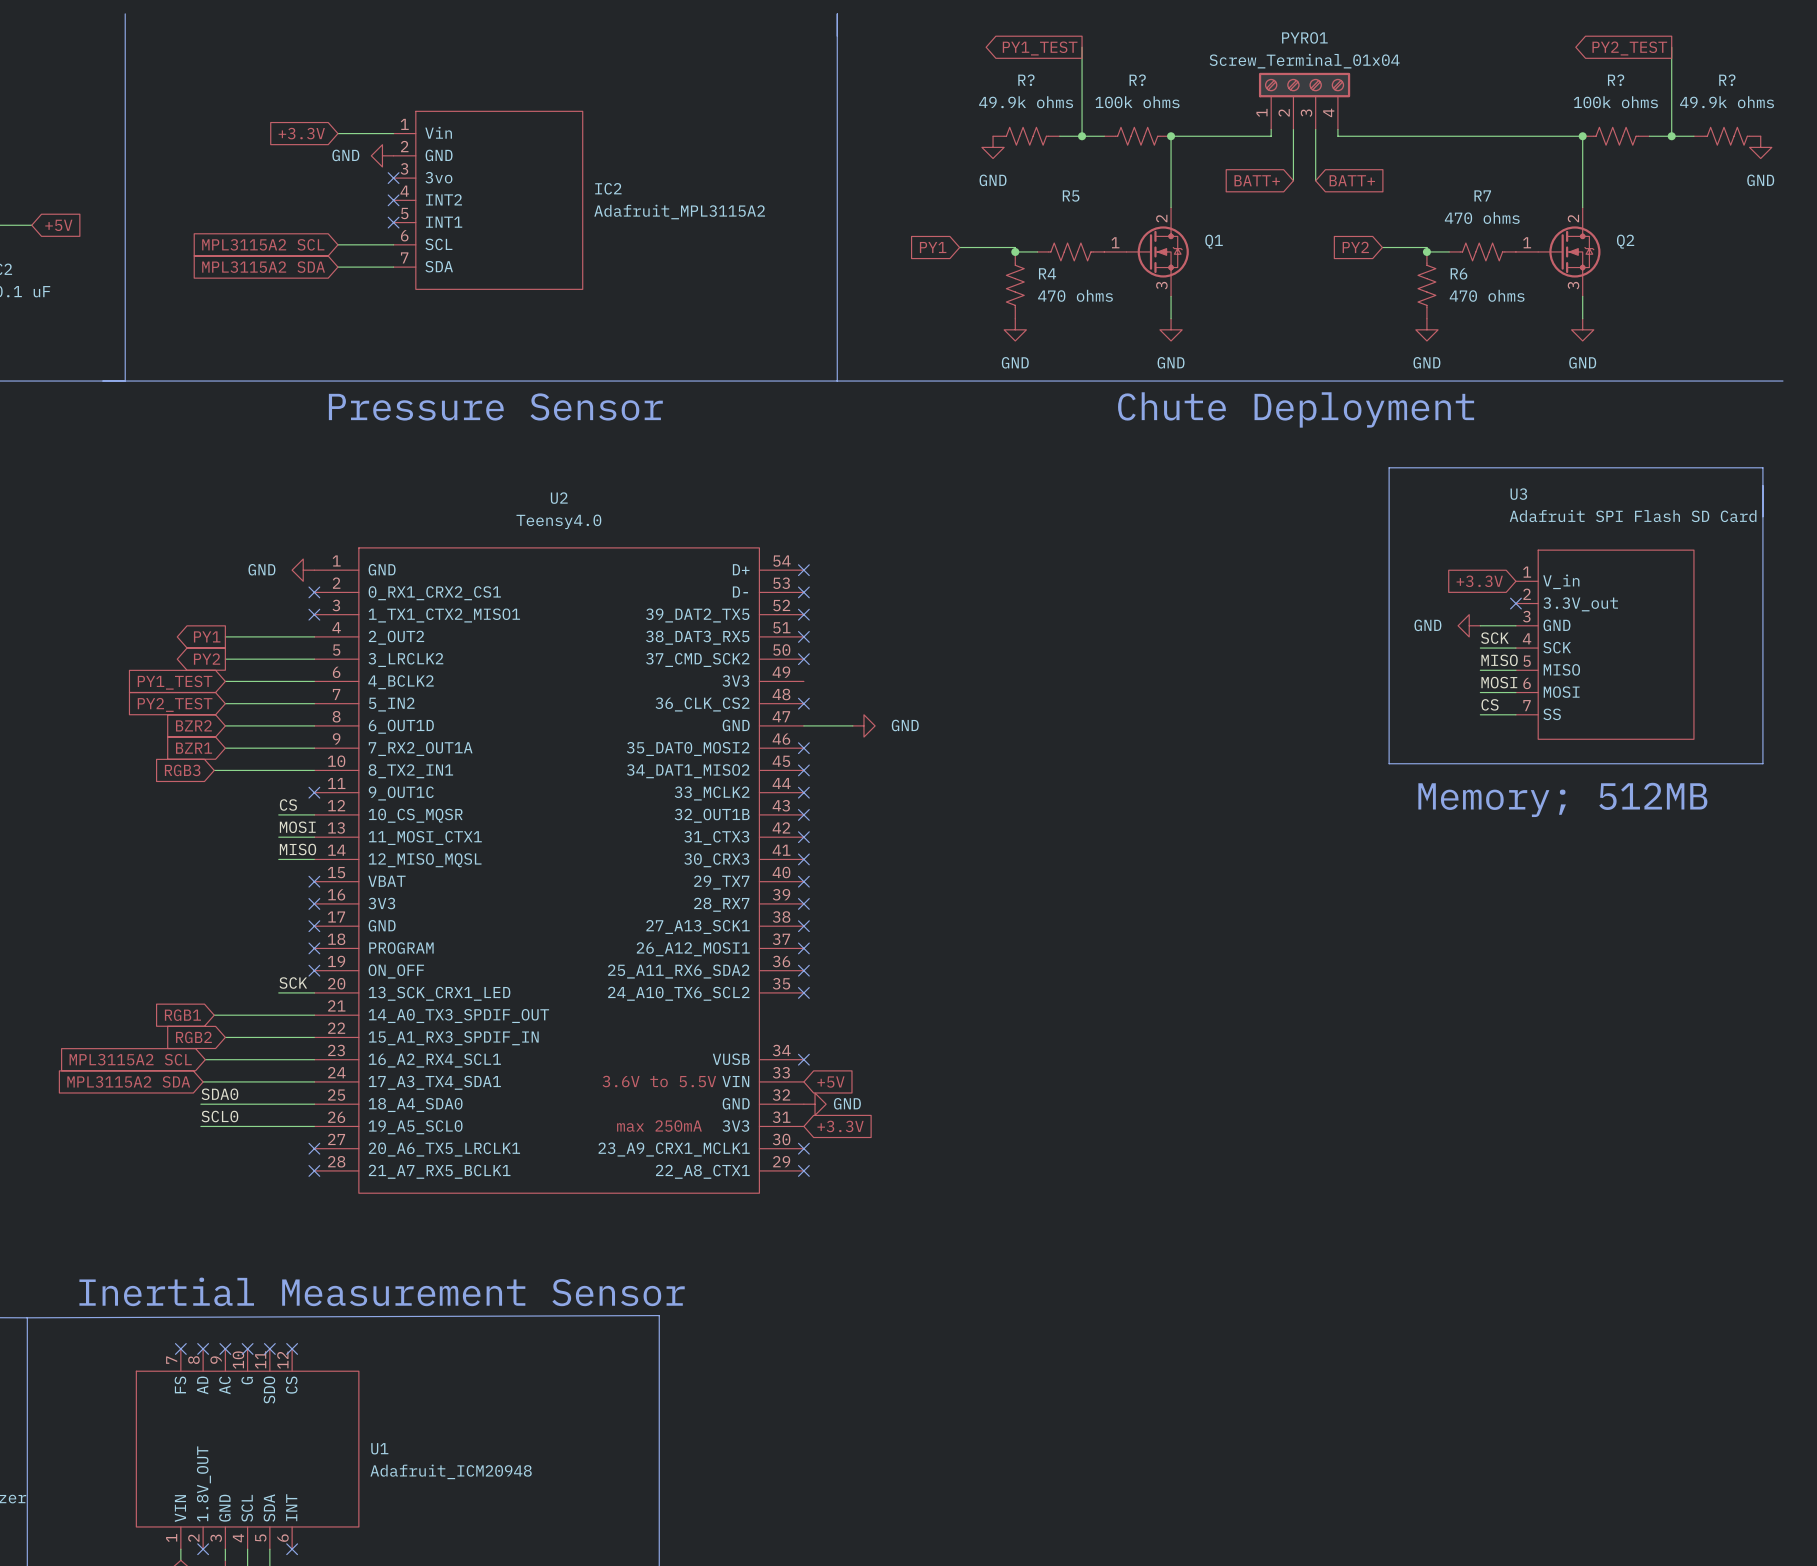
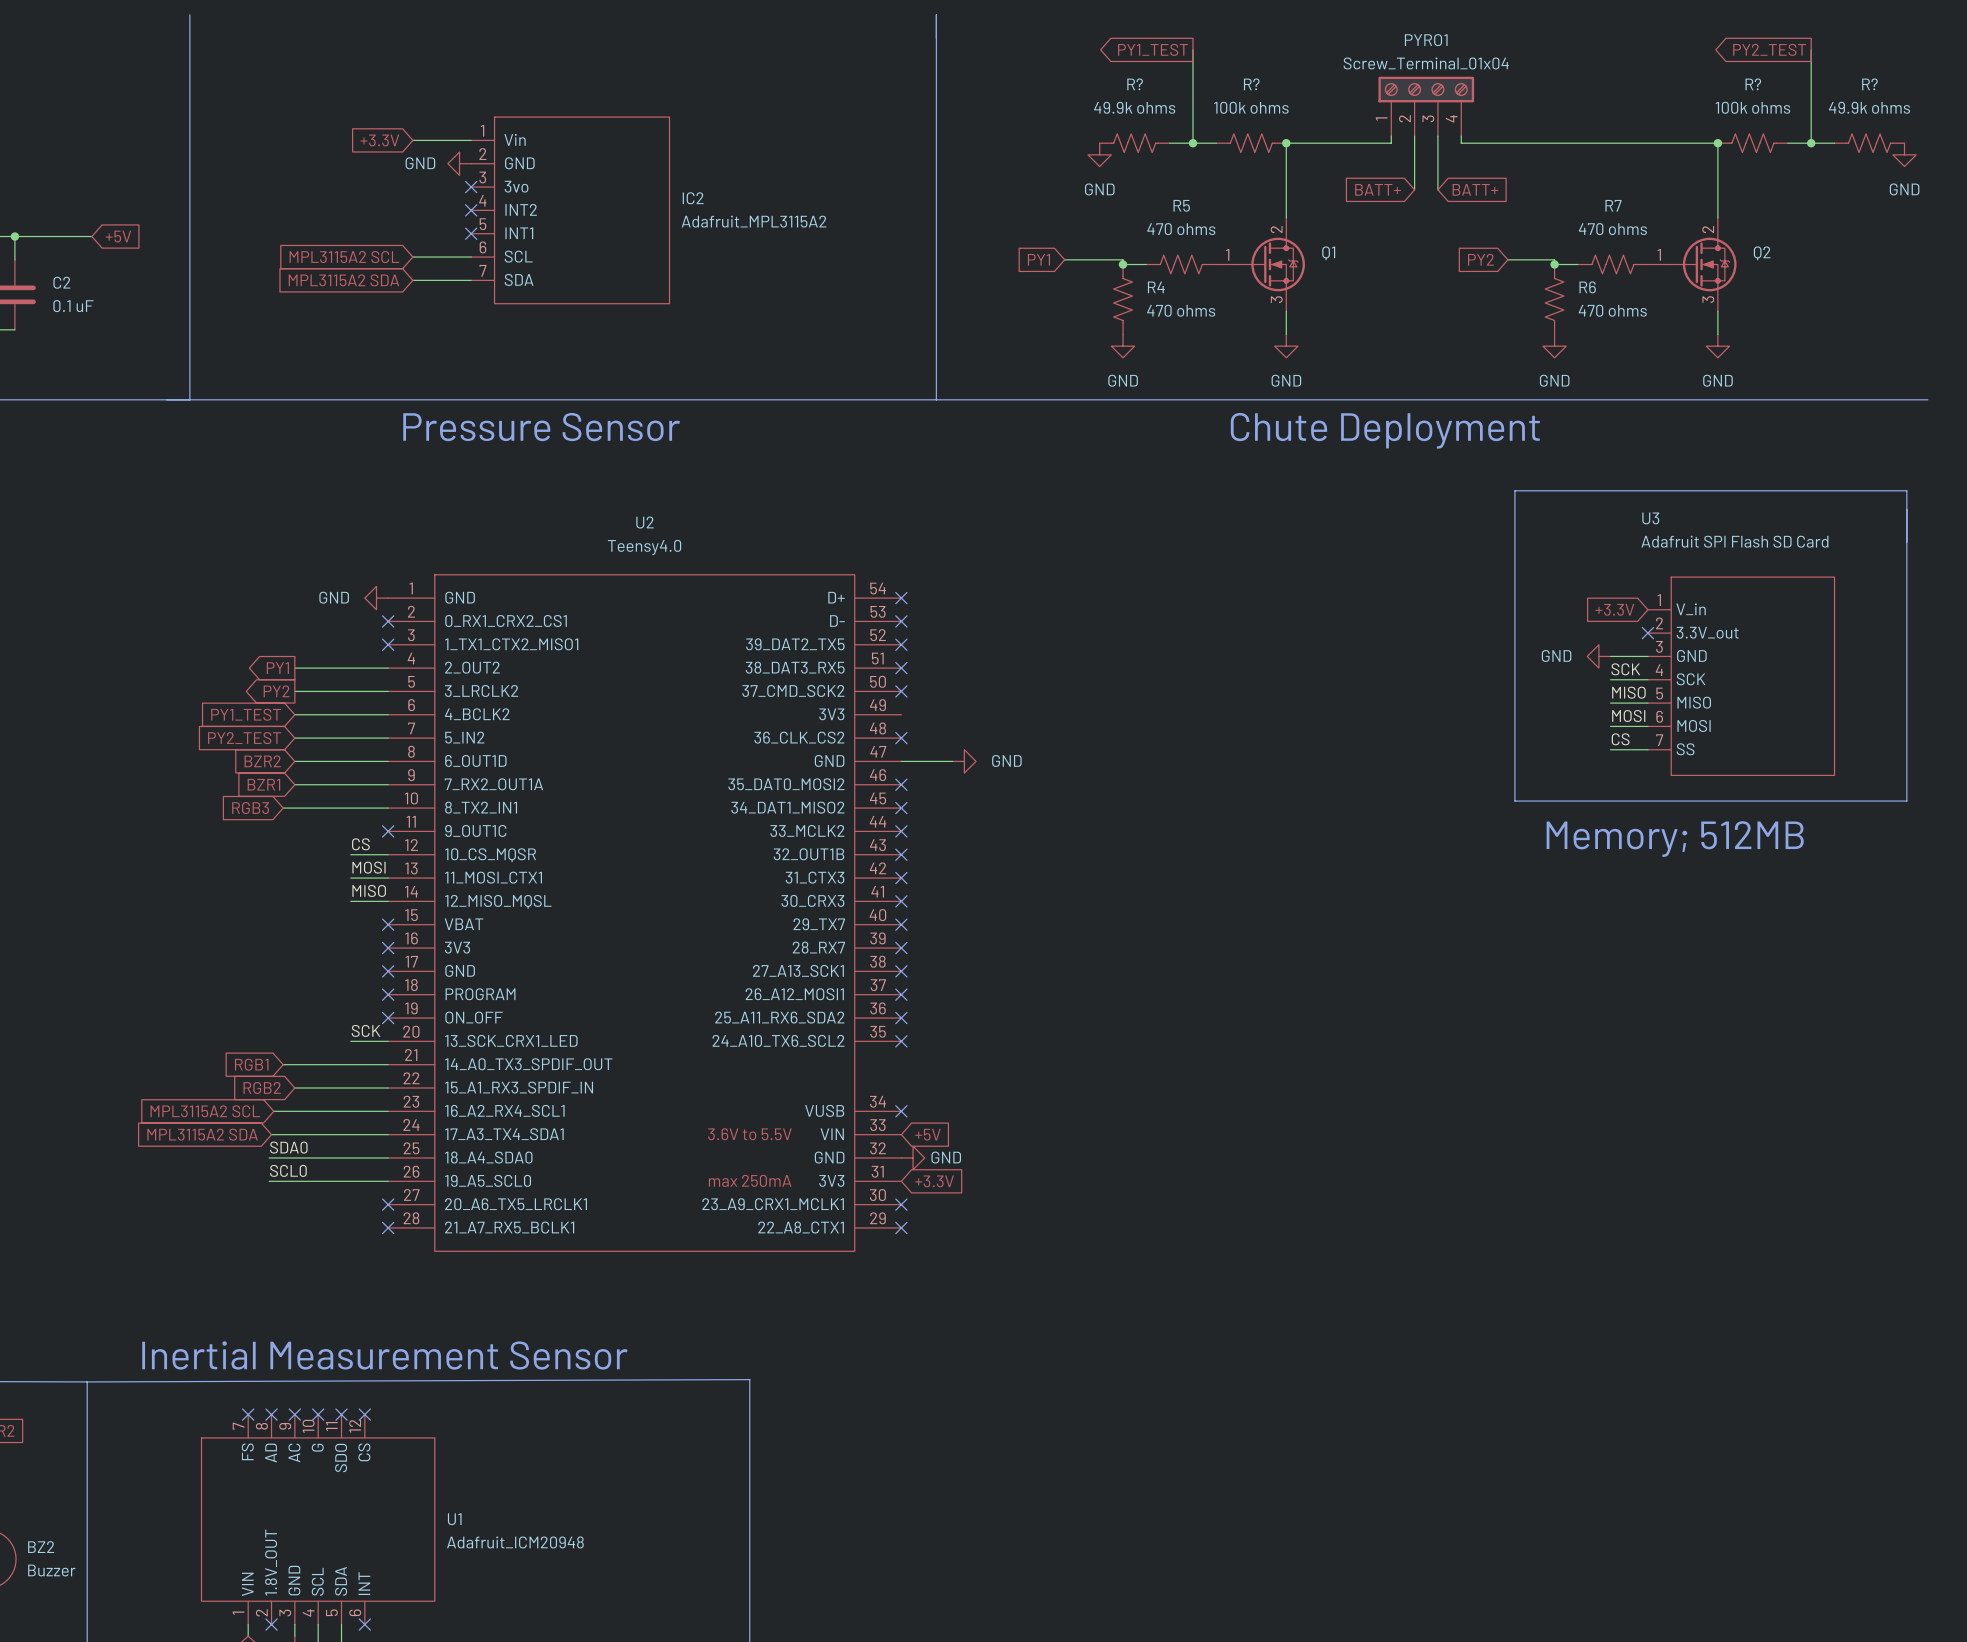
R5 value: none -> 470 ohms (1181, 229)

